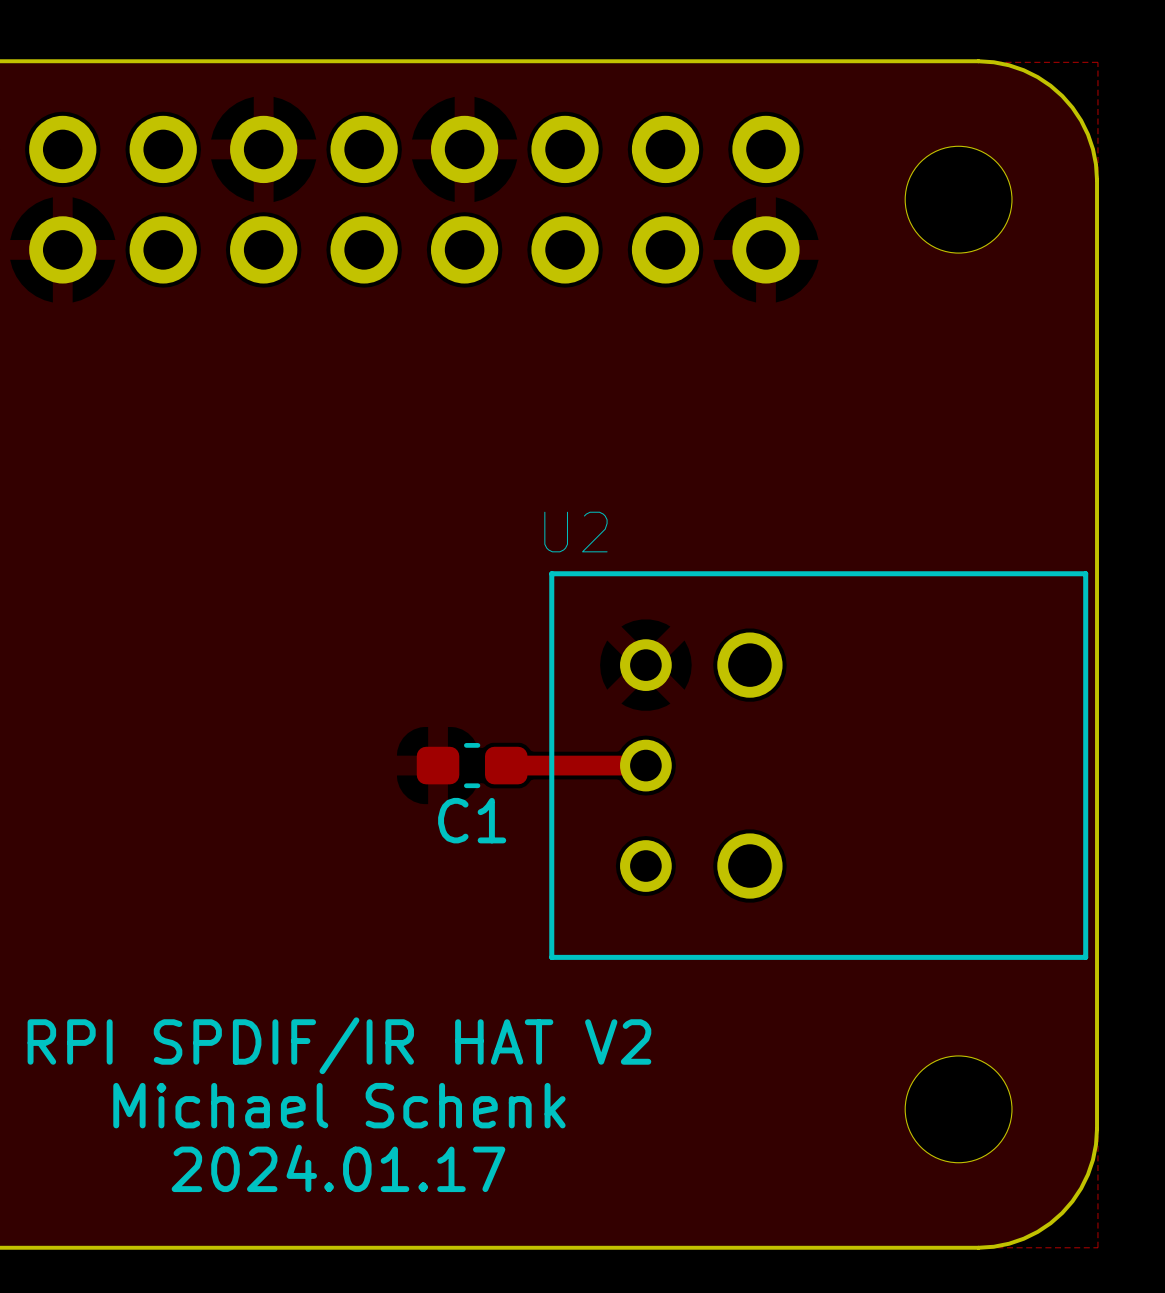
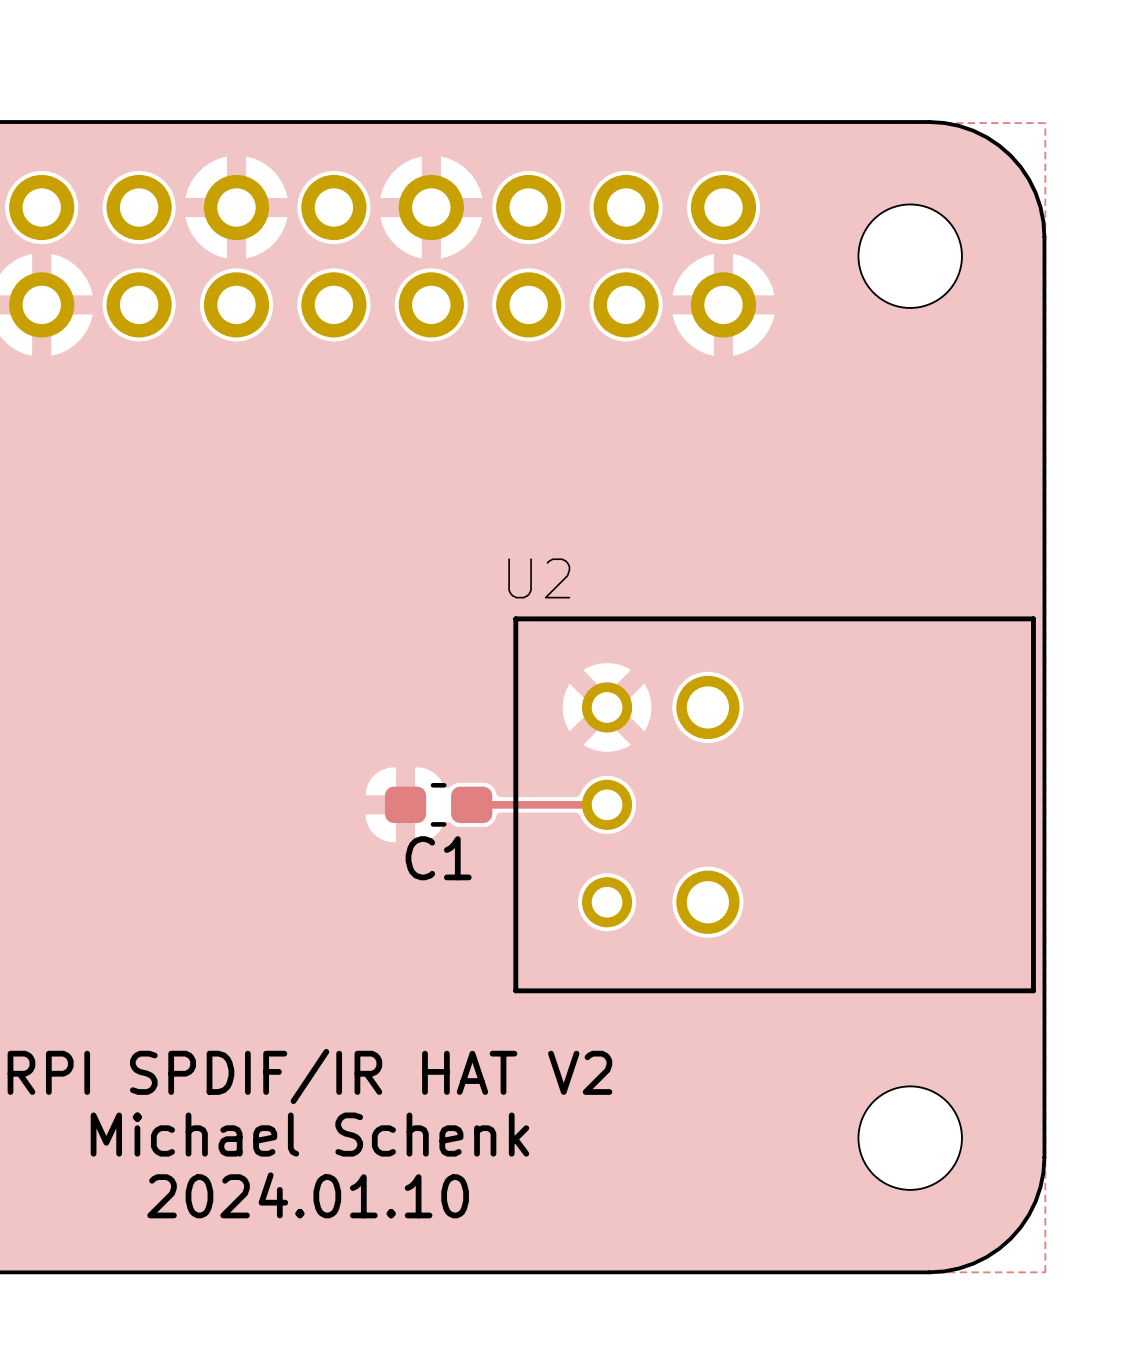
track width: thick (506, 765) (645, 765) -> thin (471, 804) (607, 804)
text: 2024.01.17 (338, 1168) -> 2024.01.10 (308, 1195)

